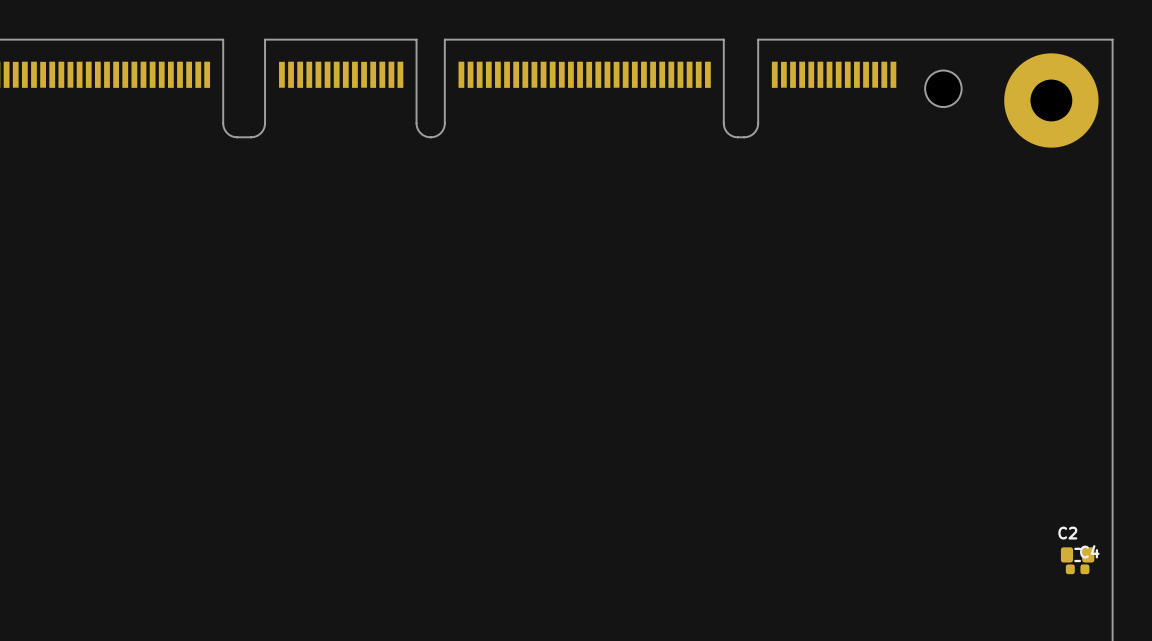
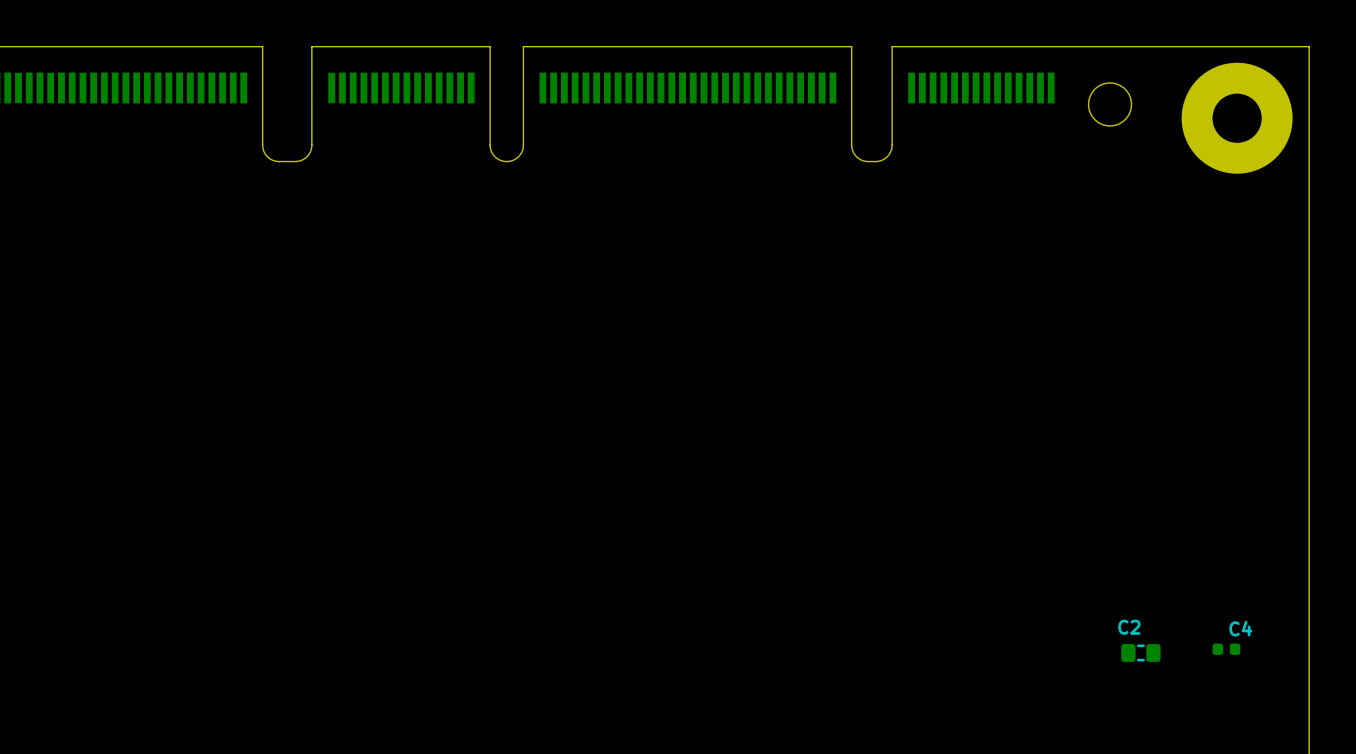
C2 position: (1077, 554) -> (1140, 652)
C4 position: (1077, 569) -> (1226, 649)

